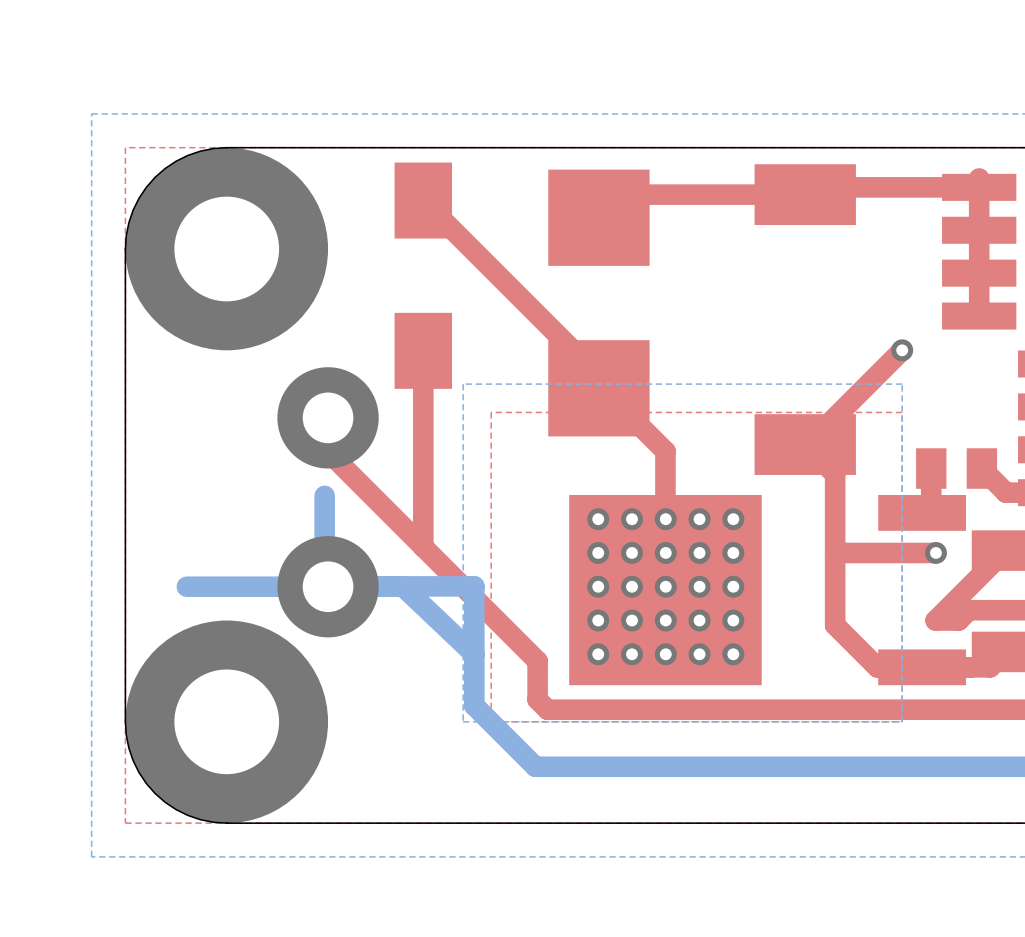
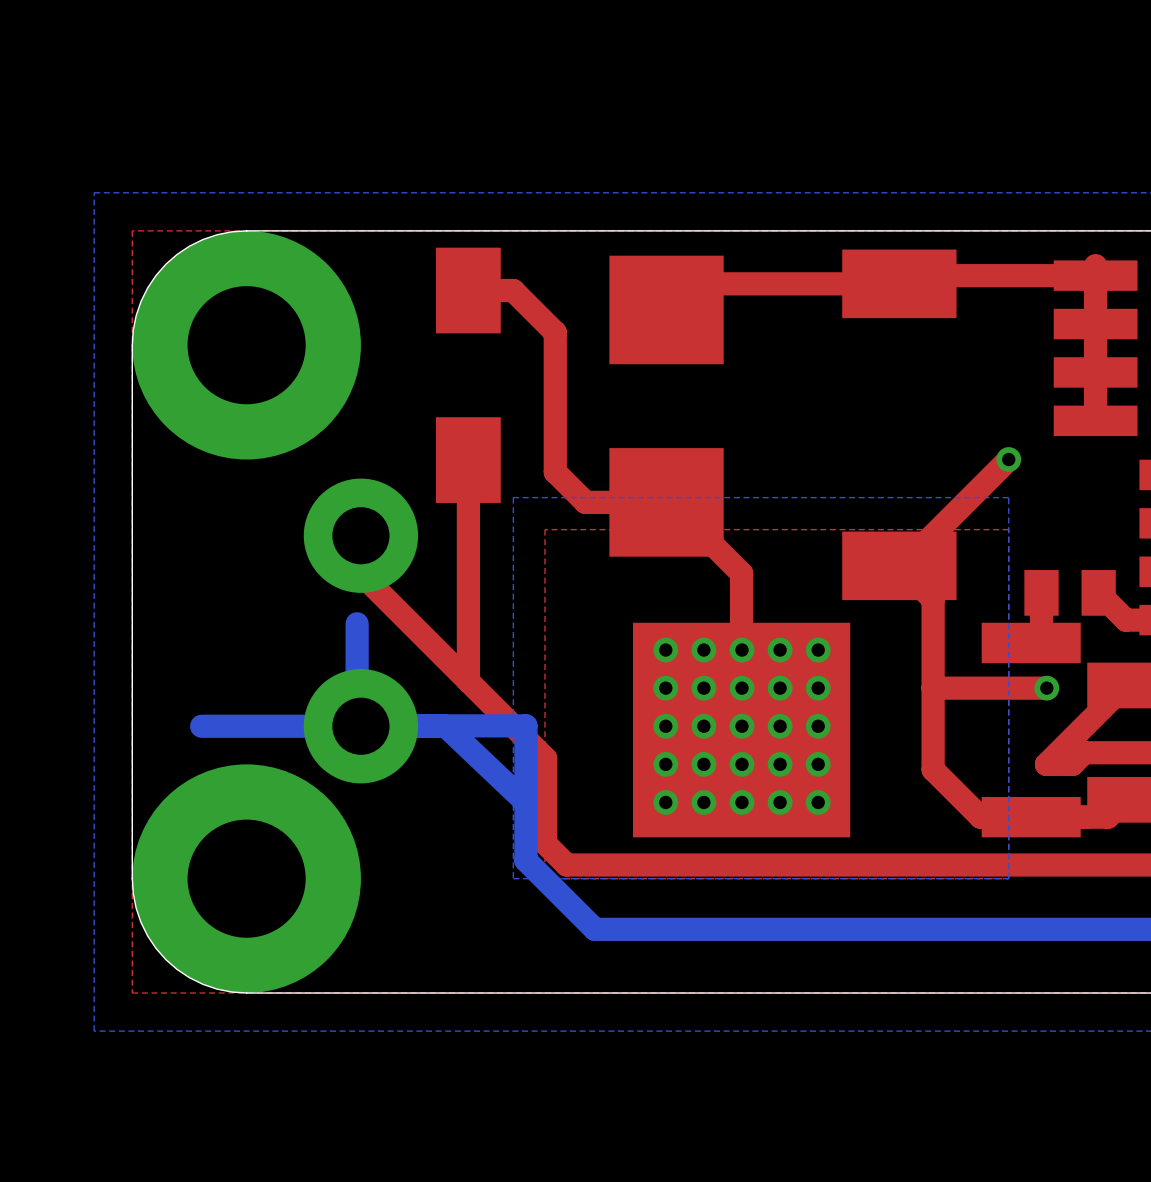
top track: (423, 200) (598, 376) -> (468, 290) (513, 290) (555, 332) (555, 472) (585, 502) (666, 502)
top track: (491, 615) (537, 661) (537, 699) (547, 709) -> (545, 758) (545, 843) (566, 865) (608, 865)

